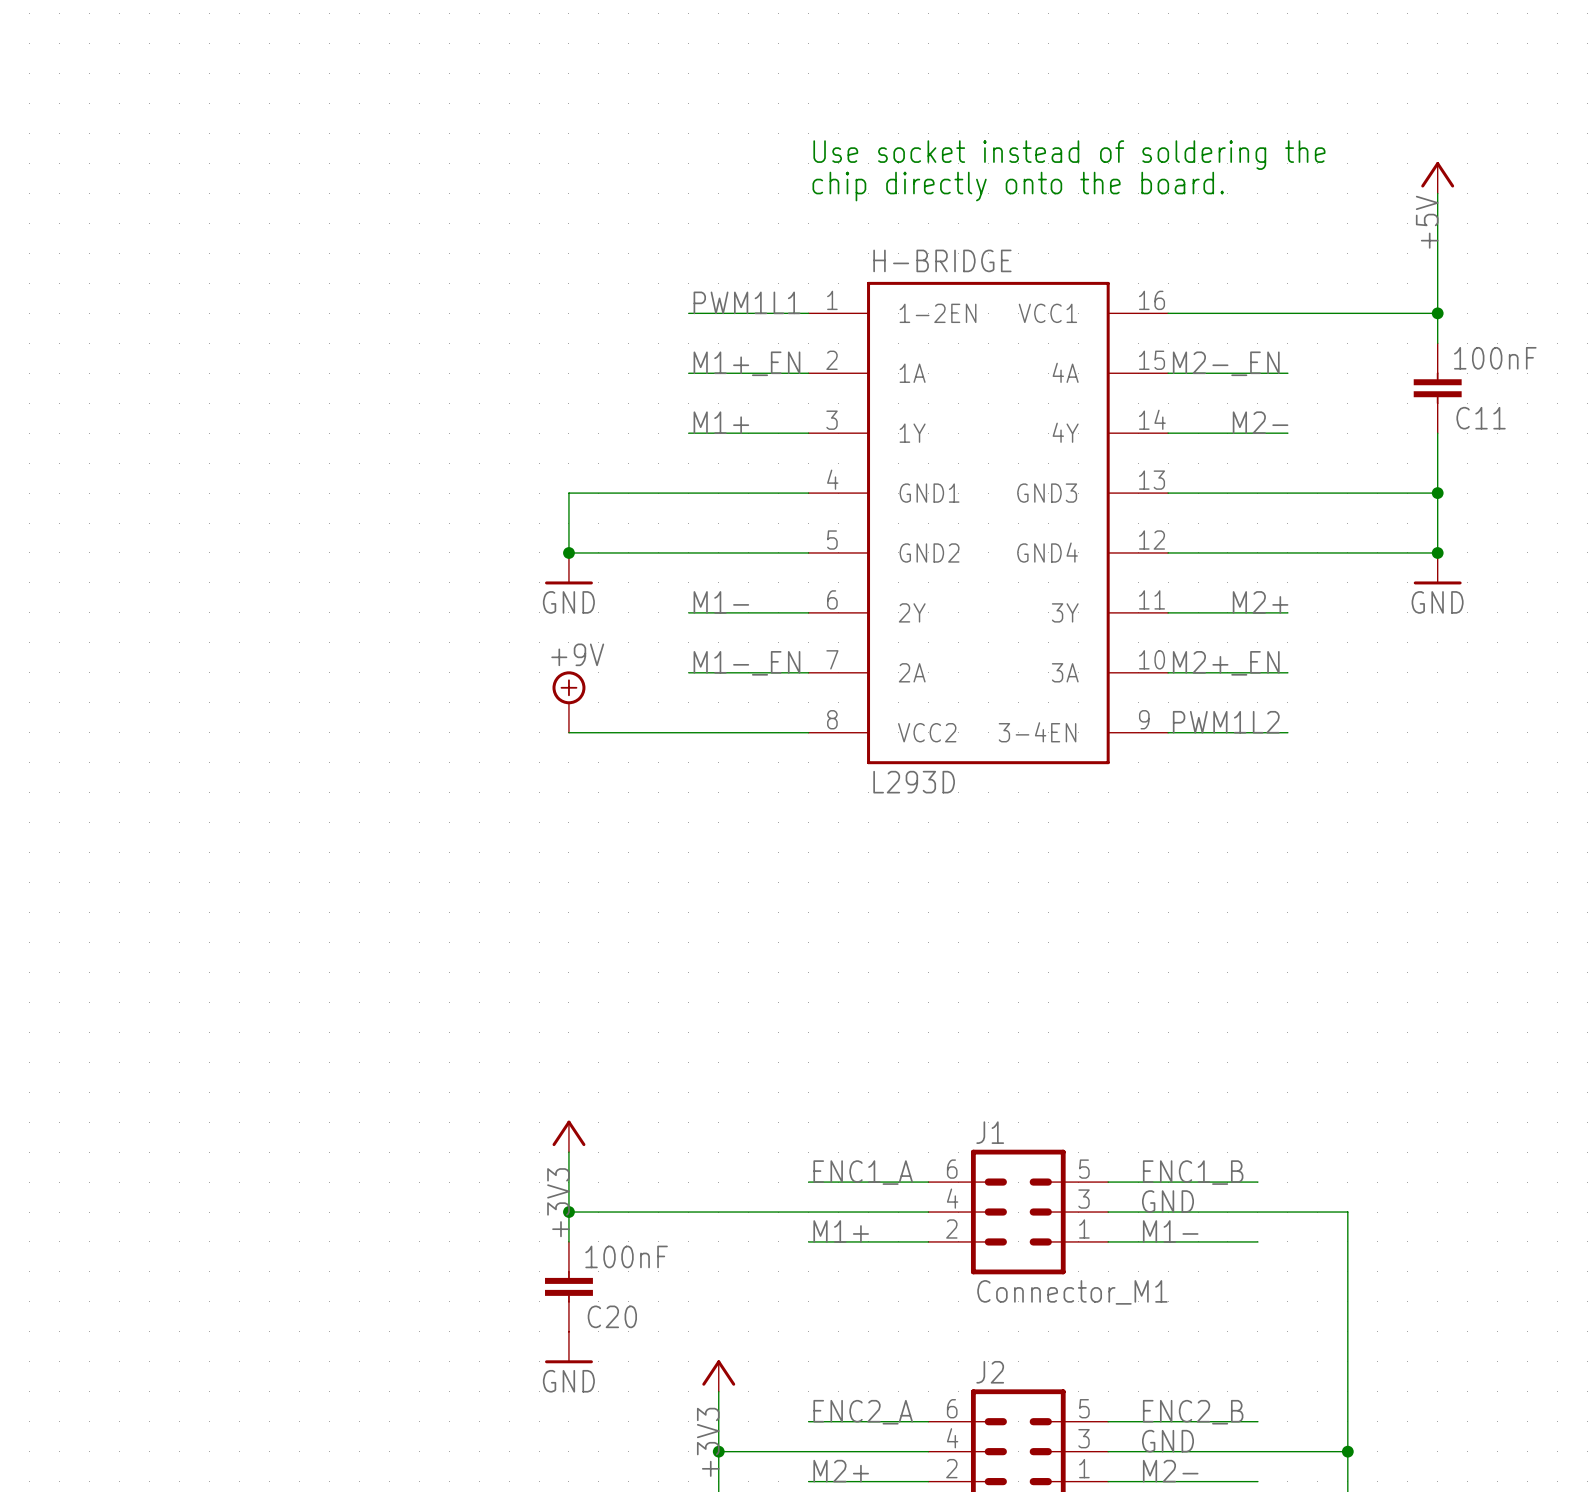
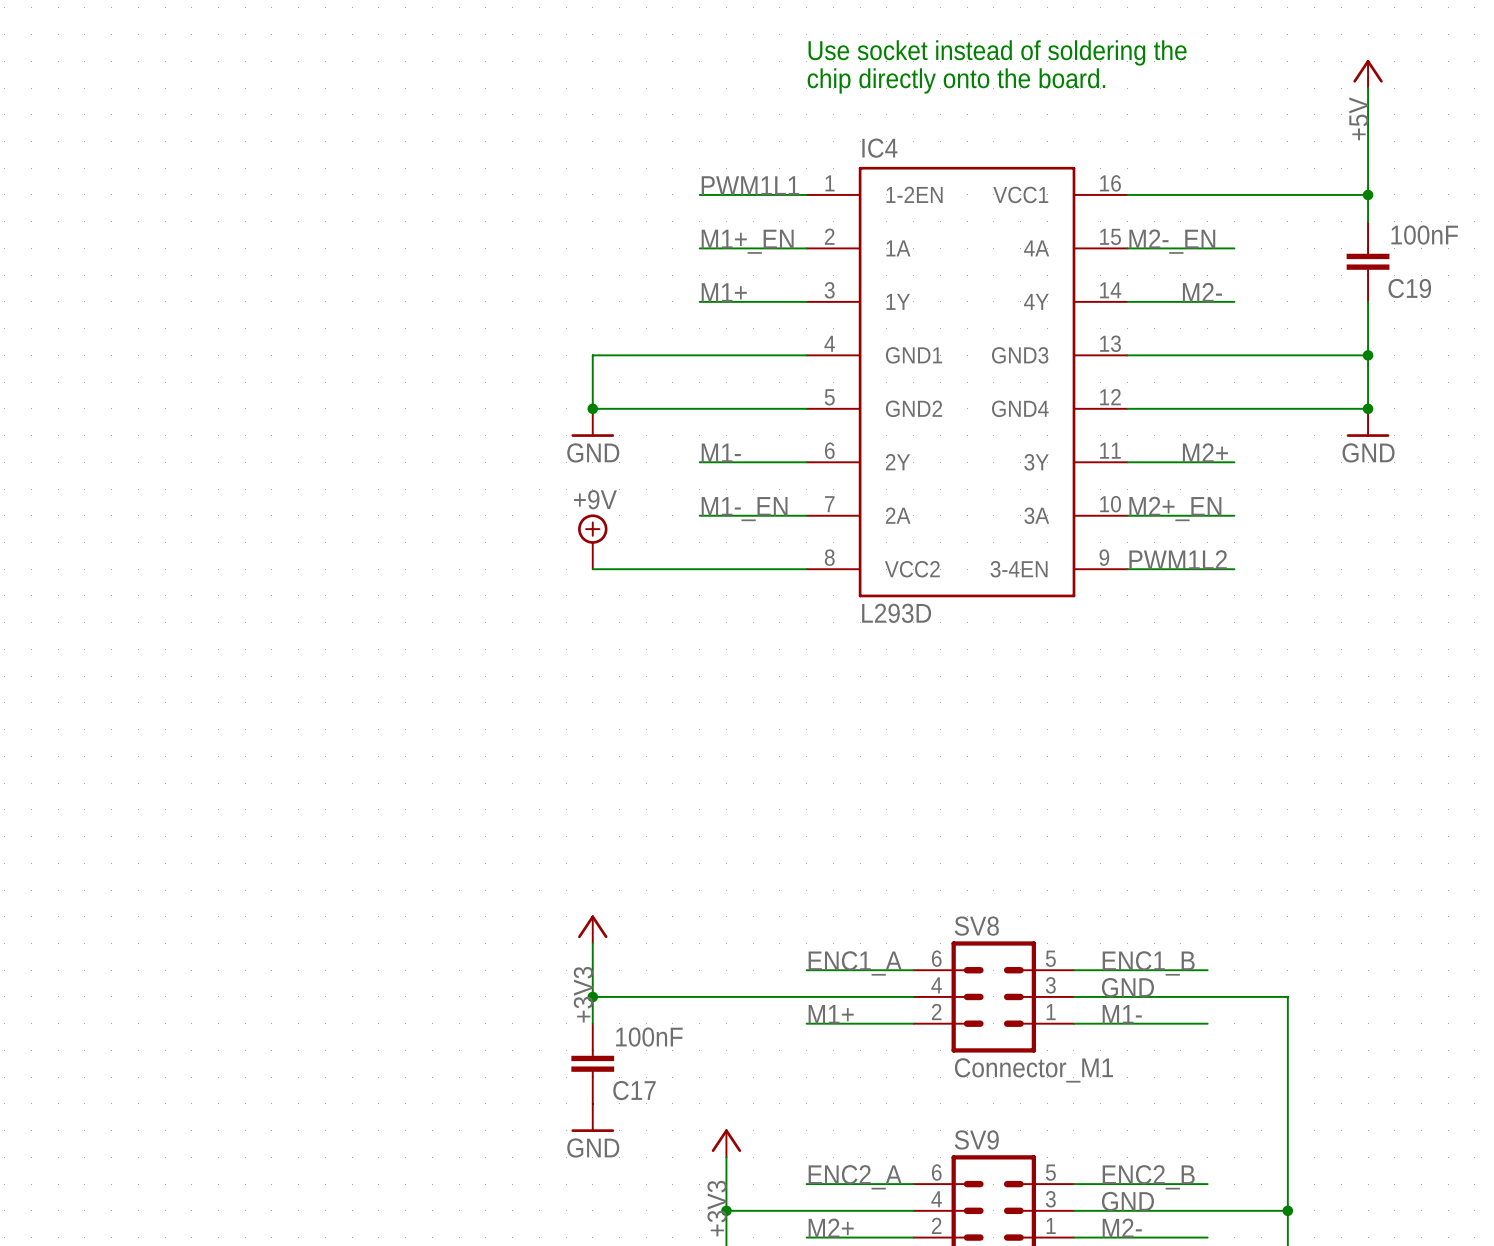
H-BRIDGE name: H-BRIDGE (942, 260) -> IC4 (879, 148)
C11 name: C11 (1481, 418) -> C19 (1409, 288)
J1 name: J1 (990, 1132) -> SV8 (976, 926)
C20 name: C20 (612, 1316) -> C17 (634, 1090)
J2 name: J2 (990, 1372) -> SV9 (976, 1139)

